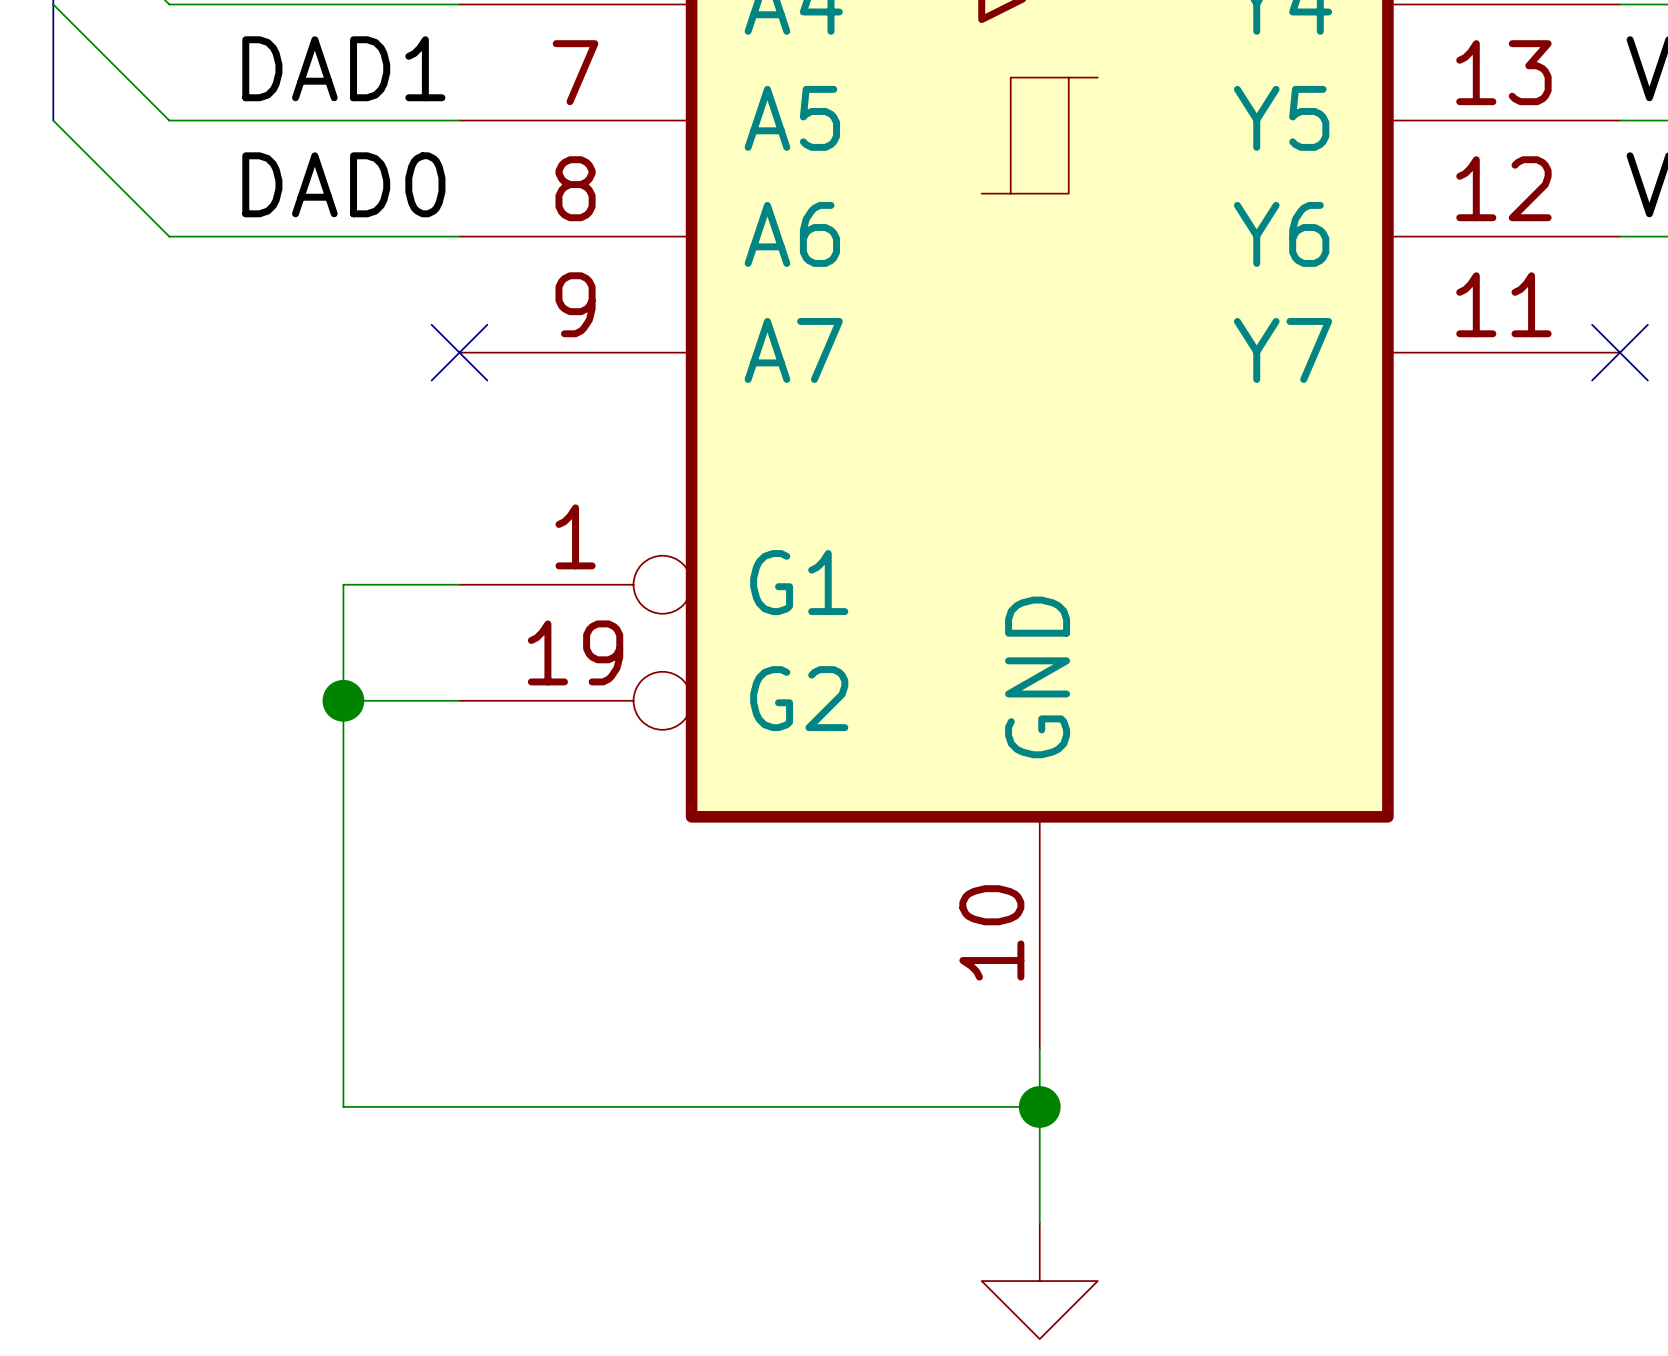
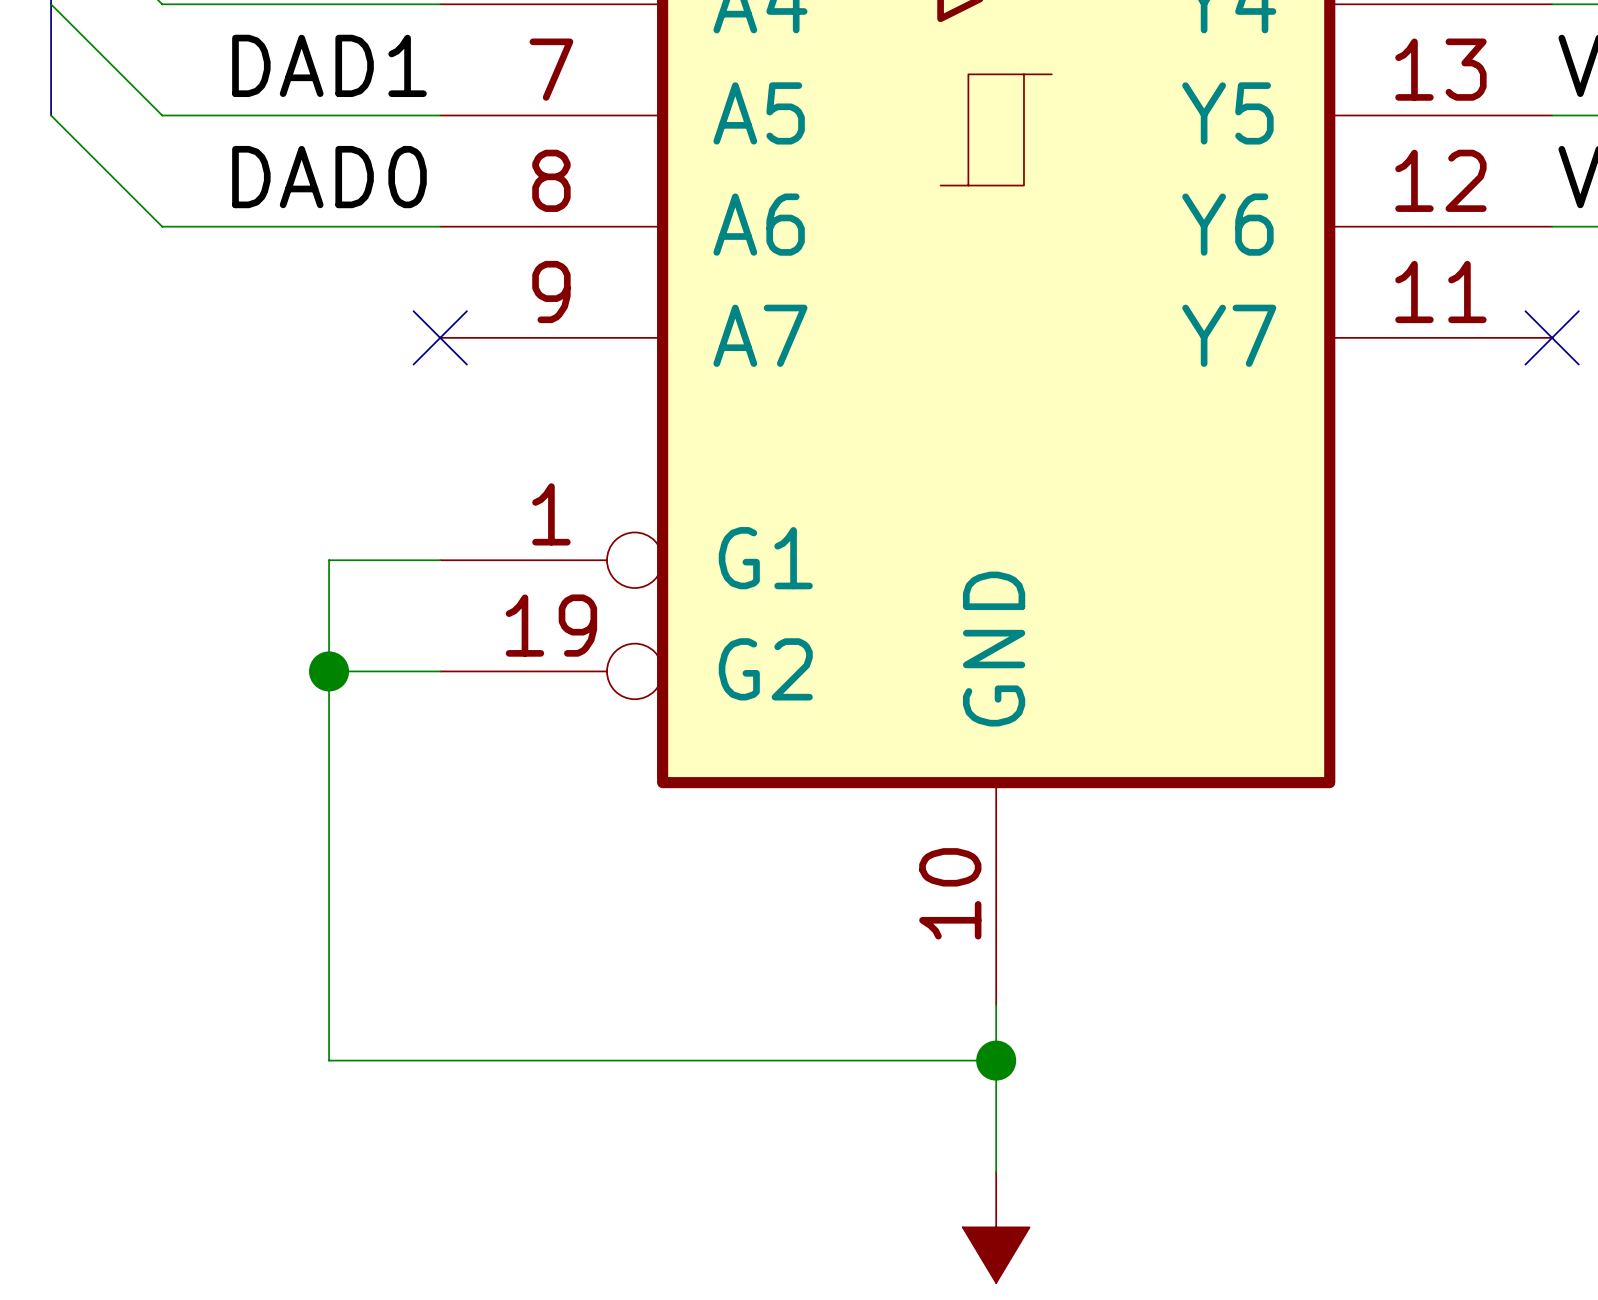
power symbol shape: [981, 1223, 1098, 1340] -> [962, 1171, 1030, 1283]

